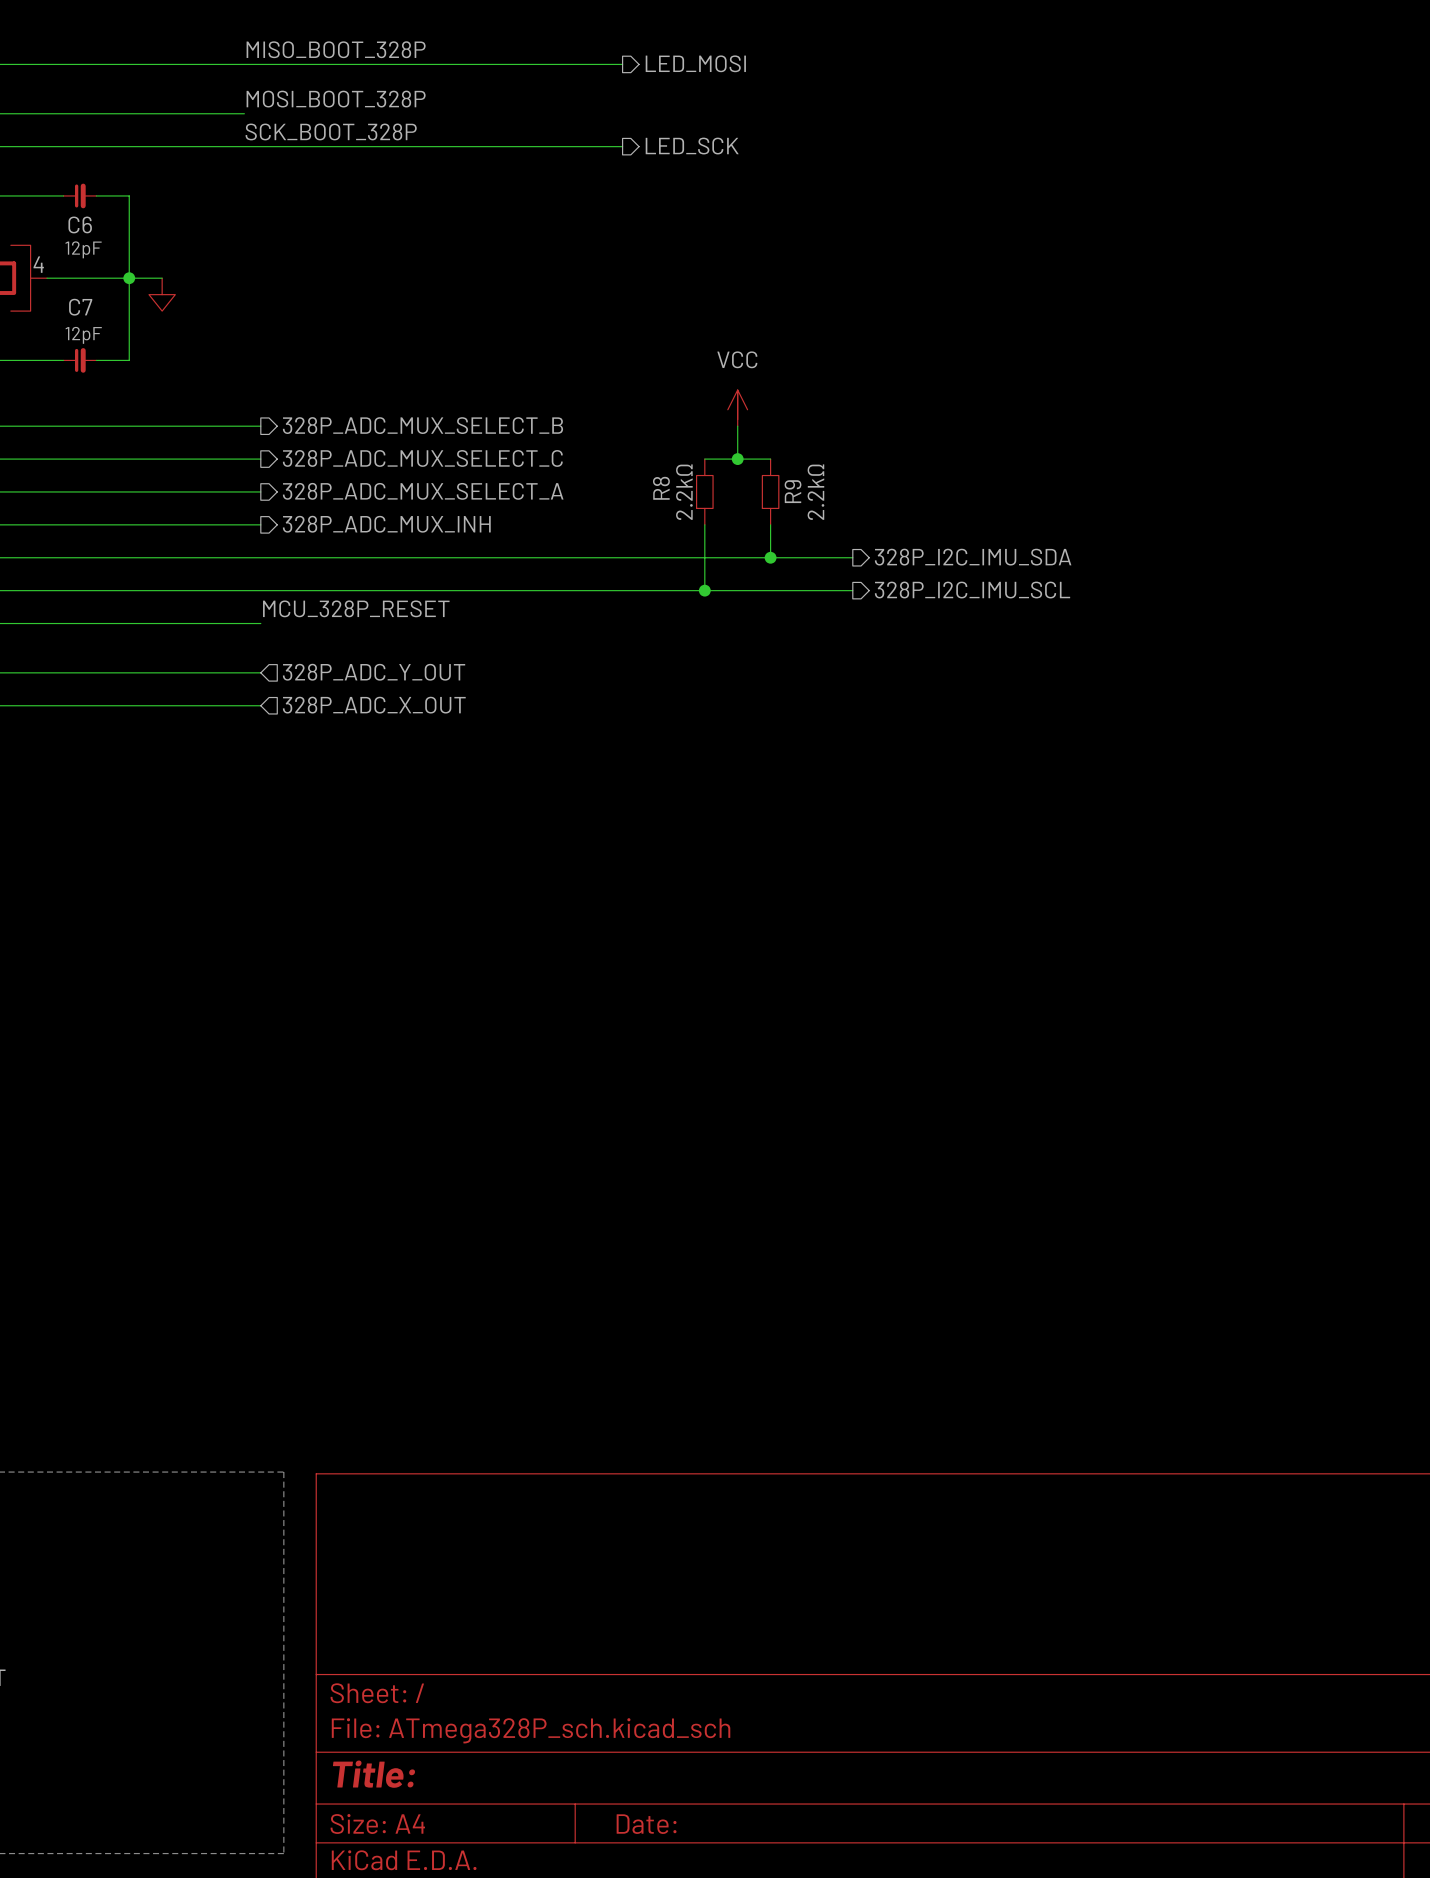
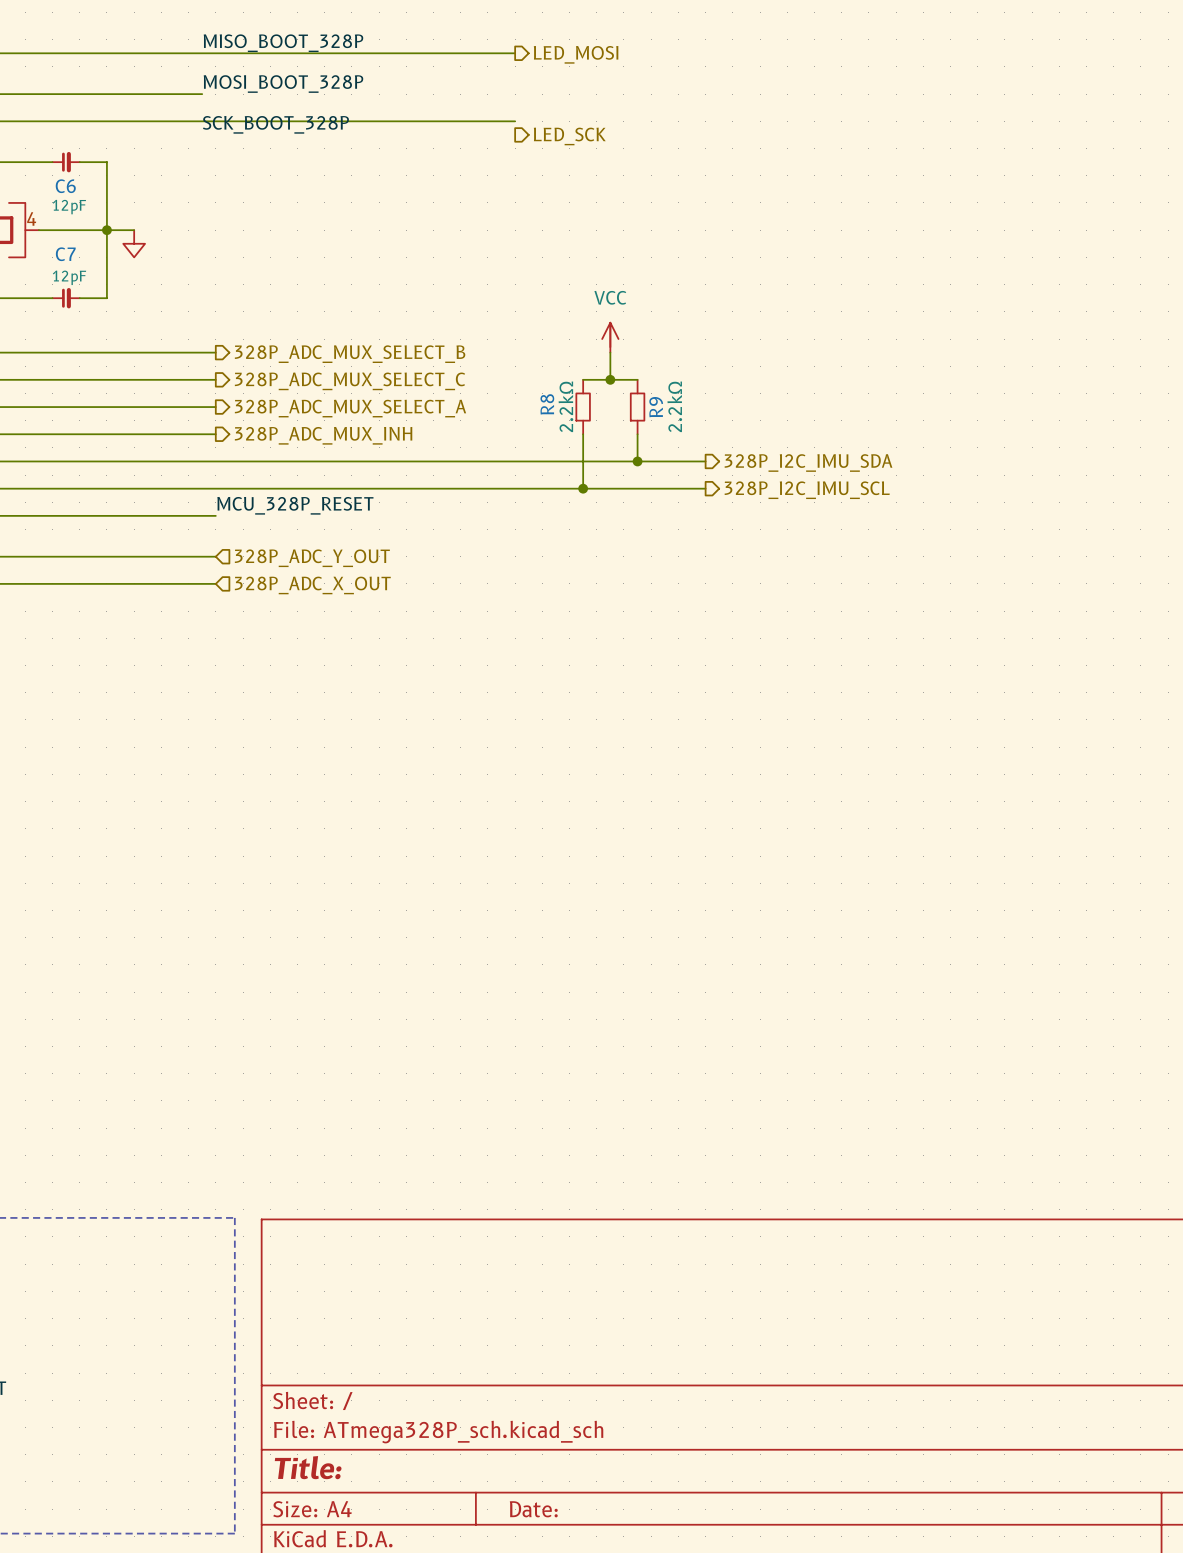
label position: SCK_BOOT_328P (331, 131) -> SCK_BOOT_328P (275, 124)
hierarchical label position: LED_SCK (692, 146) -> LED_SCK (569, 136)

